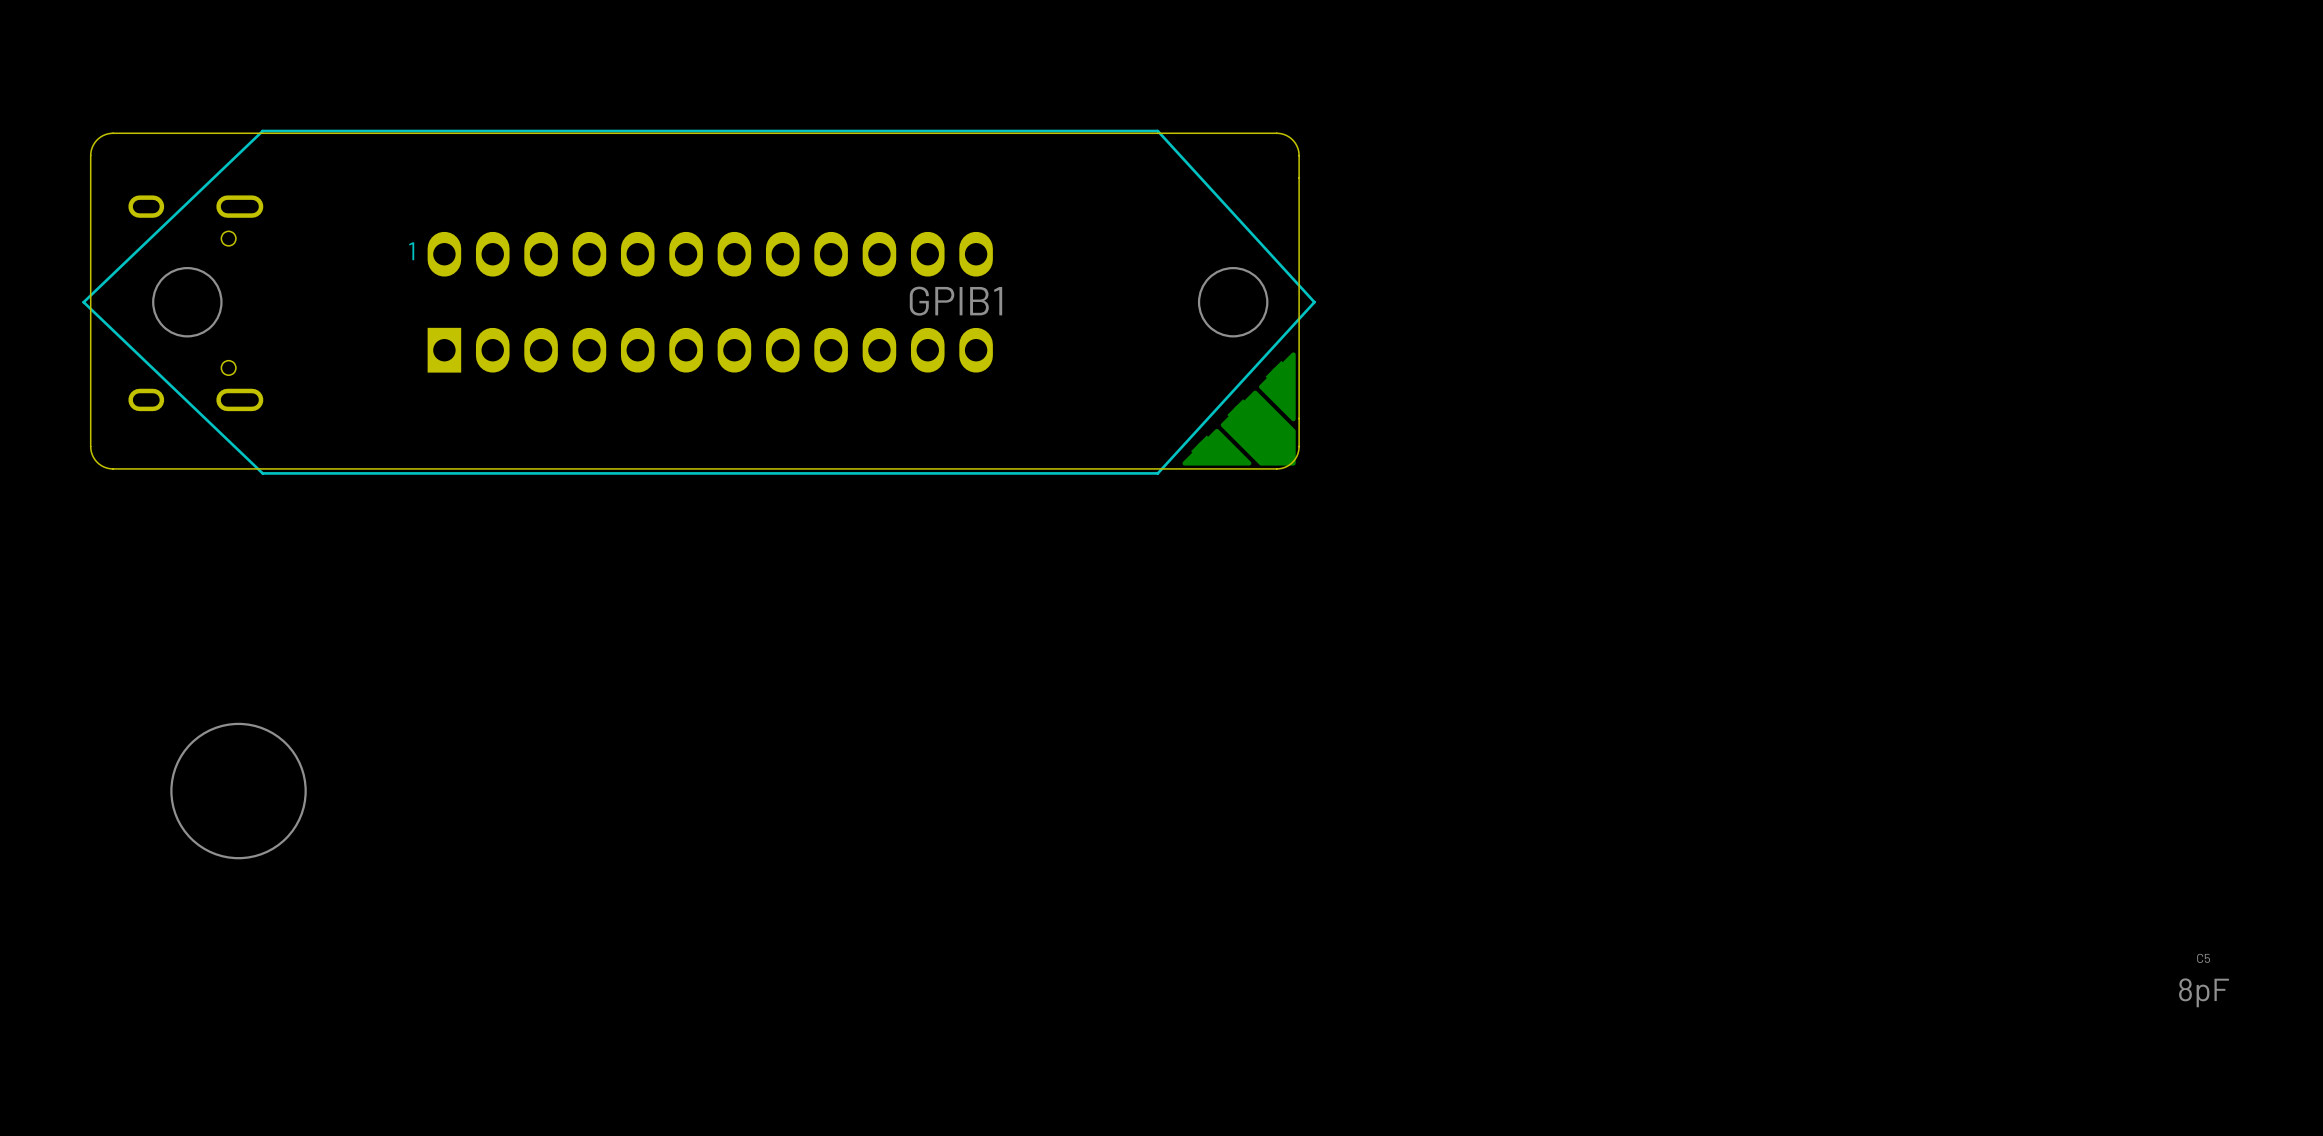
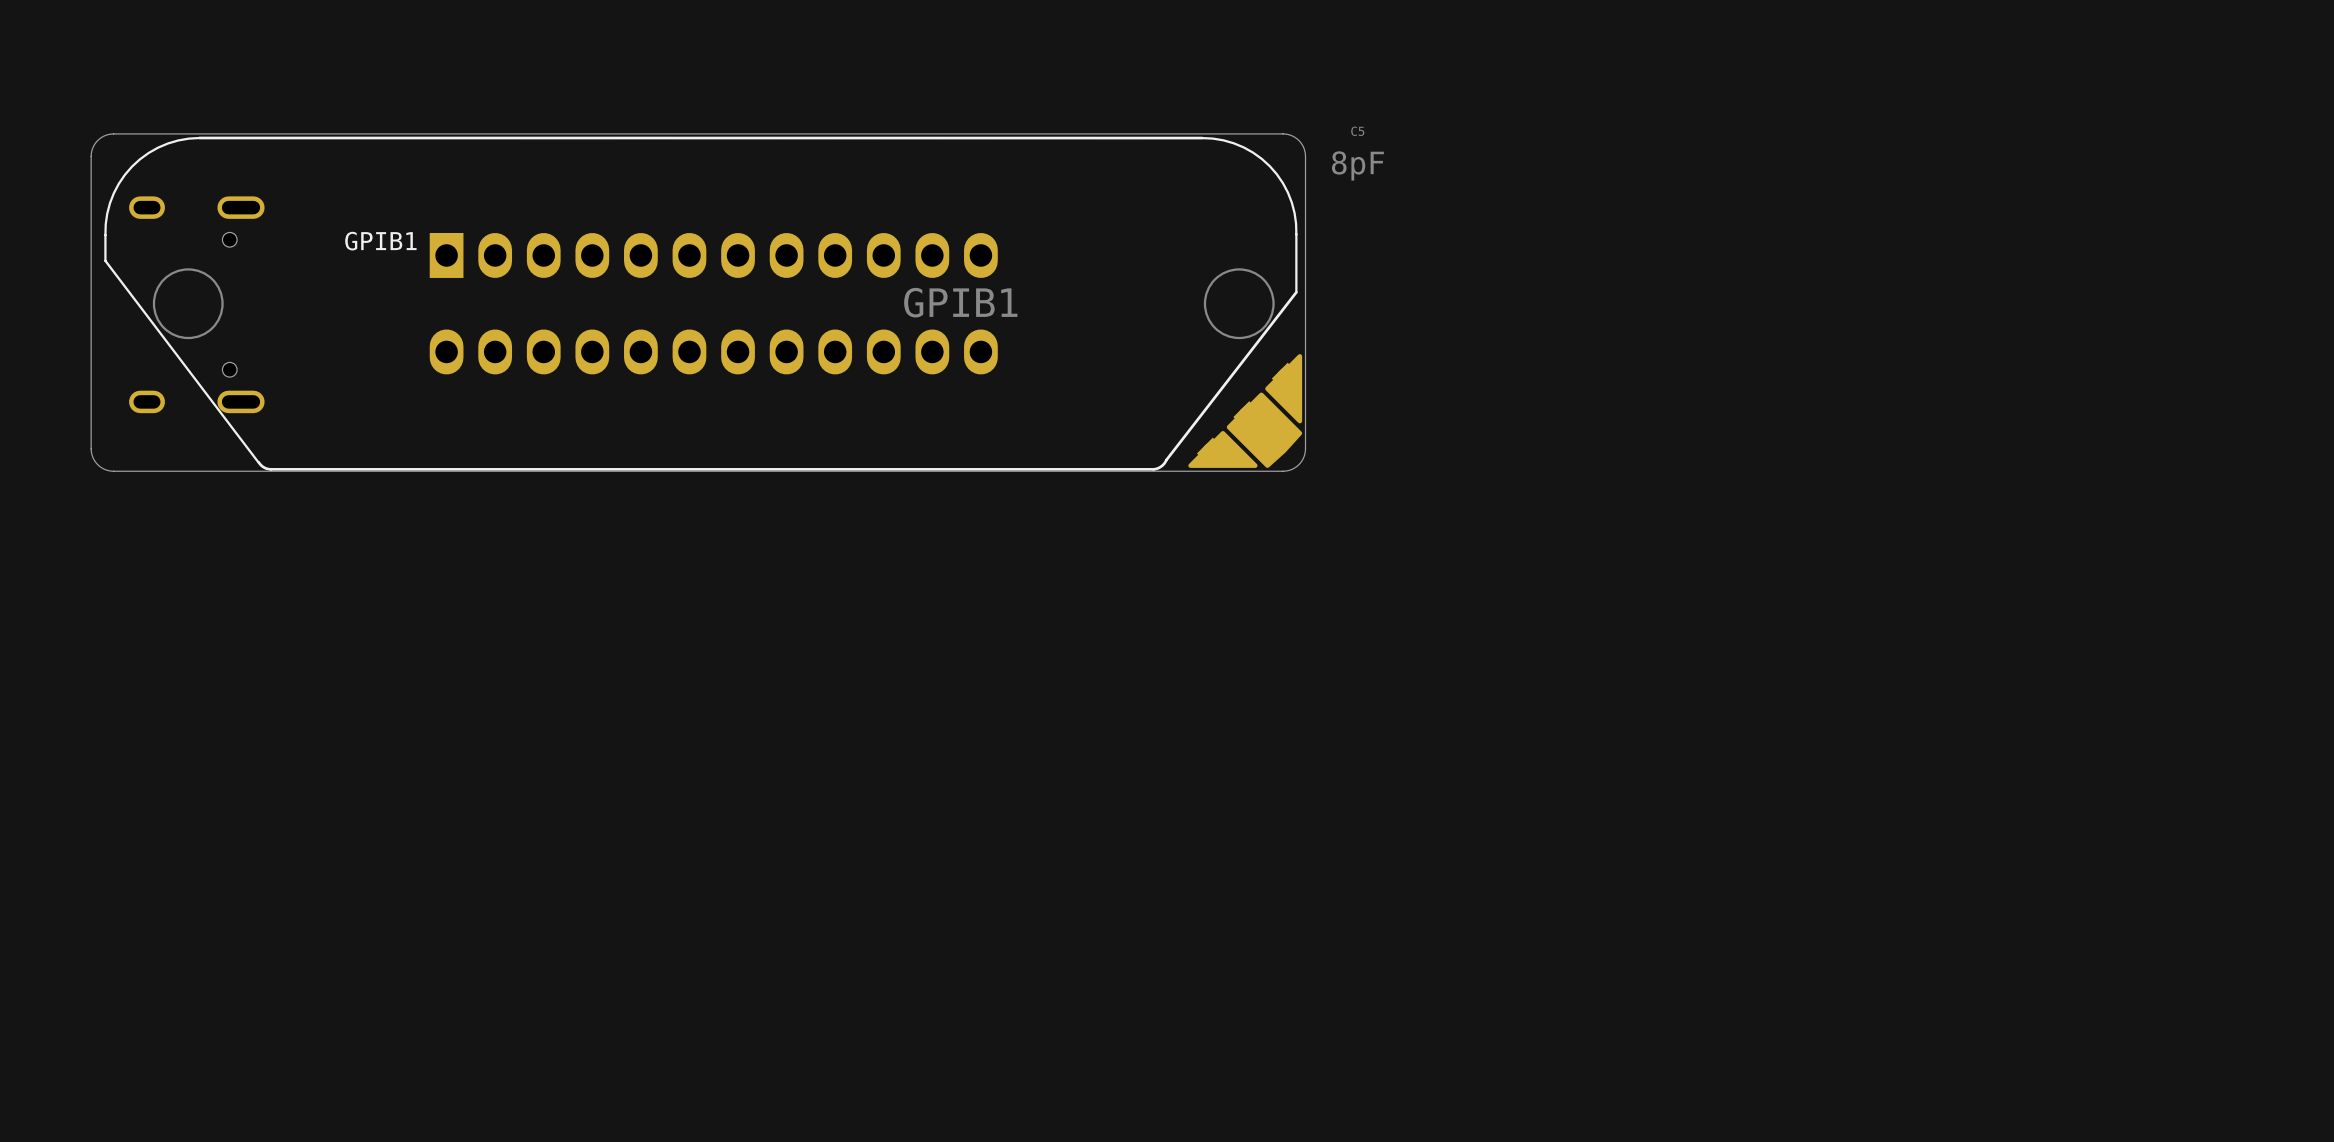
GPIB1 footprint: [82, 129, 1316, 475] -> [104, 136, 1298, 471]
text: none -> GPIB1 (380, 241)
text: 1 (411, 251) -> none
part footprint: [1182, 352, 1296, 466] -> [1188, 354, 1303, 468]
drawing: [170, 722, 307, 860] -> none
C5 position: (2204, 980) -> (1357, 153)

